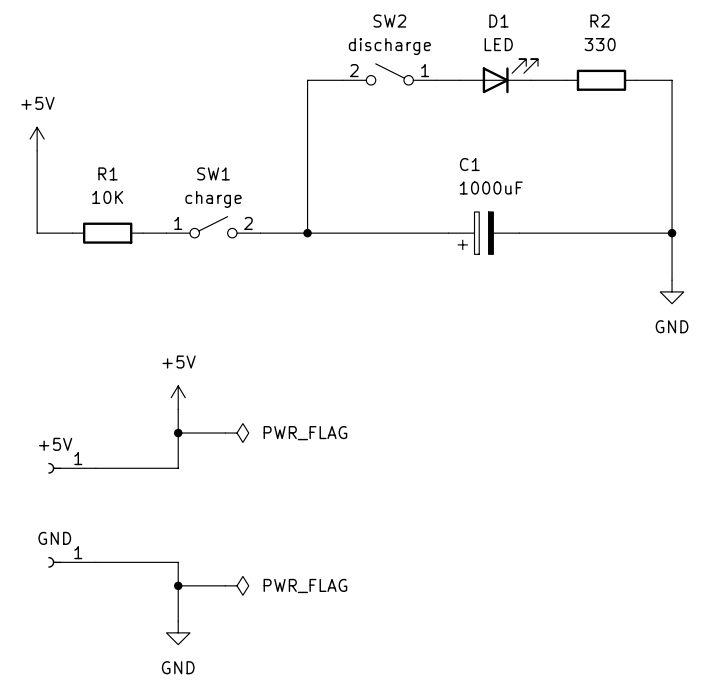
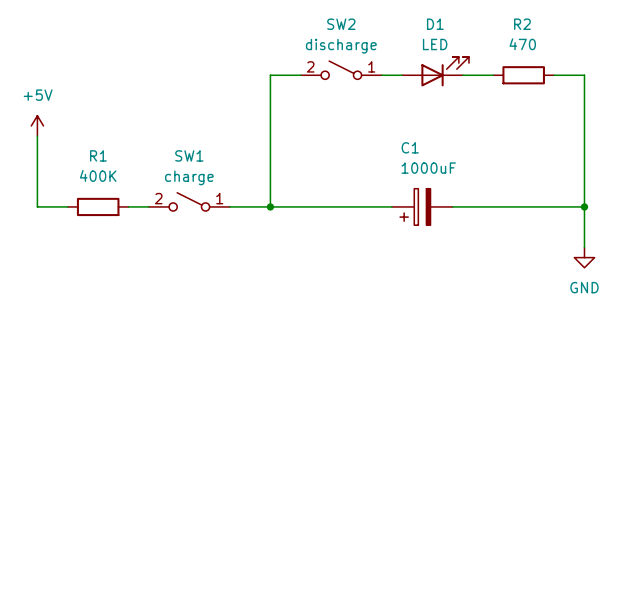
R2 value: 330 (600, 44) -> 470 (522, 44)
R1 value: 10K (107, 197) -> 400K (98, 175)
SW1 flip: as is (213, 227) -> left-right (189, 201)
power symbol: +5V (178, 397) -> none
wire: (178, 409) (178, 468) (95, 468) -> none
wire: (178, 433) (225, 433) -> none
junction: (178, 433) -> none
power symbol: PWR_FLAG (237, 433) -> none
part: +5V (72, 468) -> none
part: GND (72, 562) -> none
wire: (95, 562) (178, 562) (178, 621) -> none
wire: (178, 585) (225, 585) -> none
junction: (178, 585) -> none
power symbol: PWR_FLAG (237, 585) -> none
power symbol: GND (178, 632) -> none

